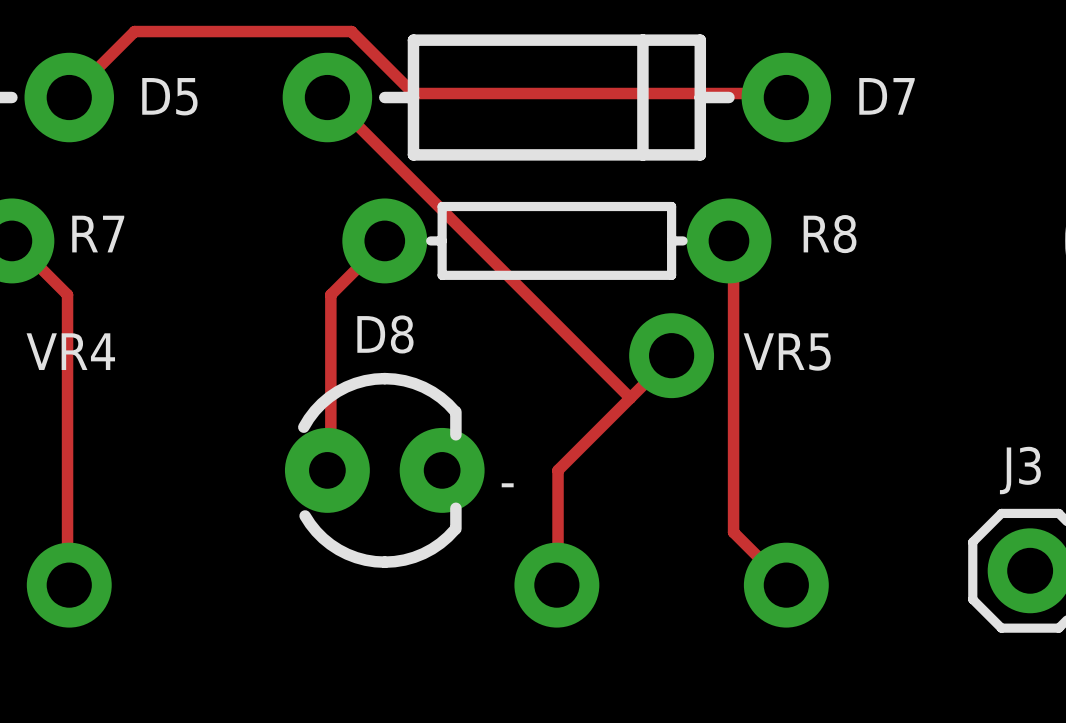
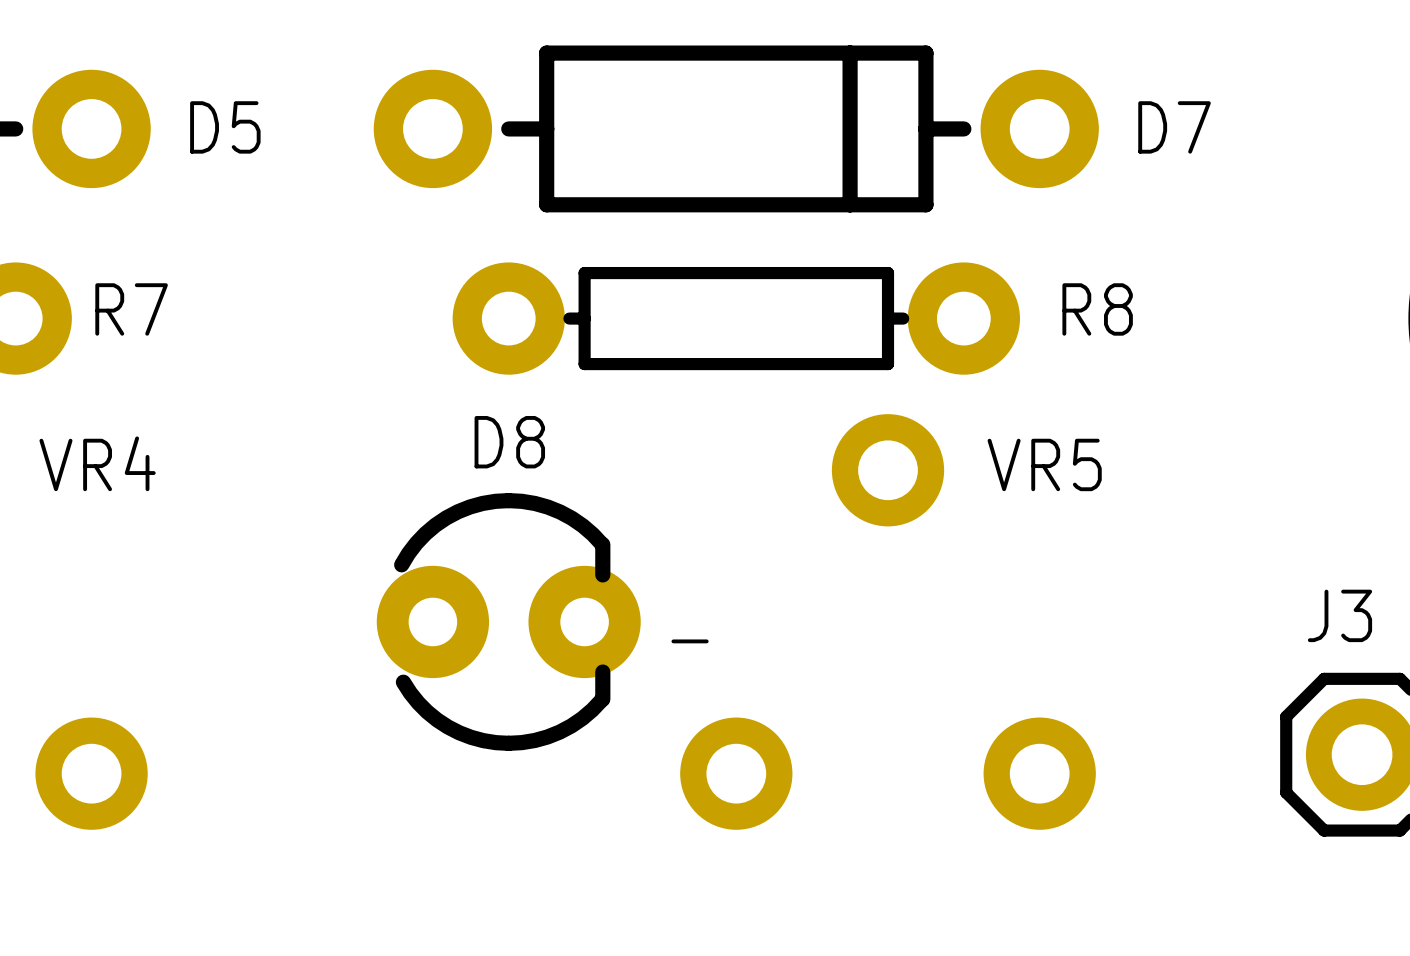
track: (69, 97) (134, 31) (351, 31) (413, 93) (785, 93) (786, 97) -> none
track: (327, 97) (330, 98) (630, 398) -> none
track: (11, 240) (67, 294) (67, 583) (69, 585) -> none
track: (384, 240) (330, 294) (330, 470) (327, 470) -> none
track: (728, 240) (733, 243) (733, 532) (786, 585) -> none
track: (671, 355) (558, 470) (556, 585) -> none

